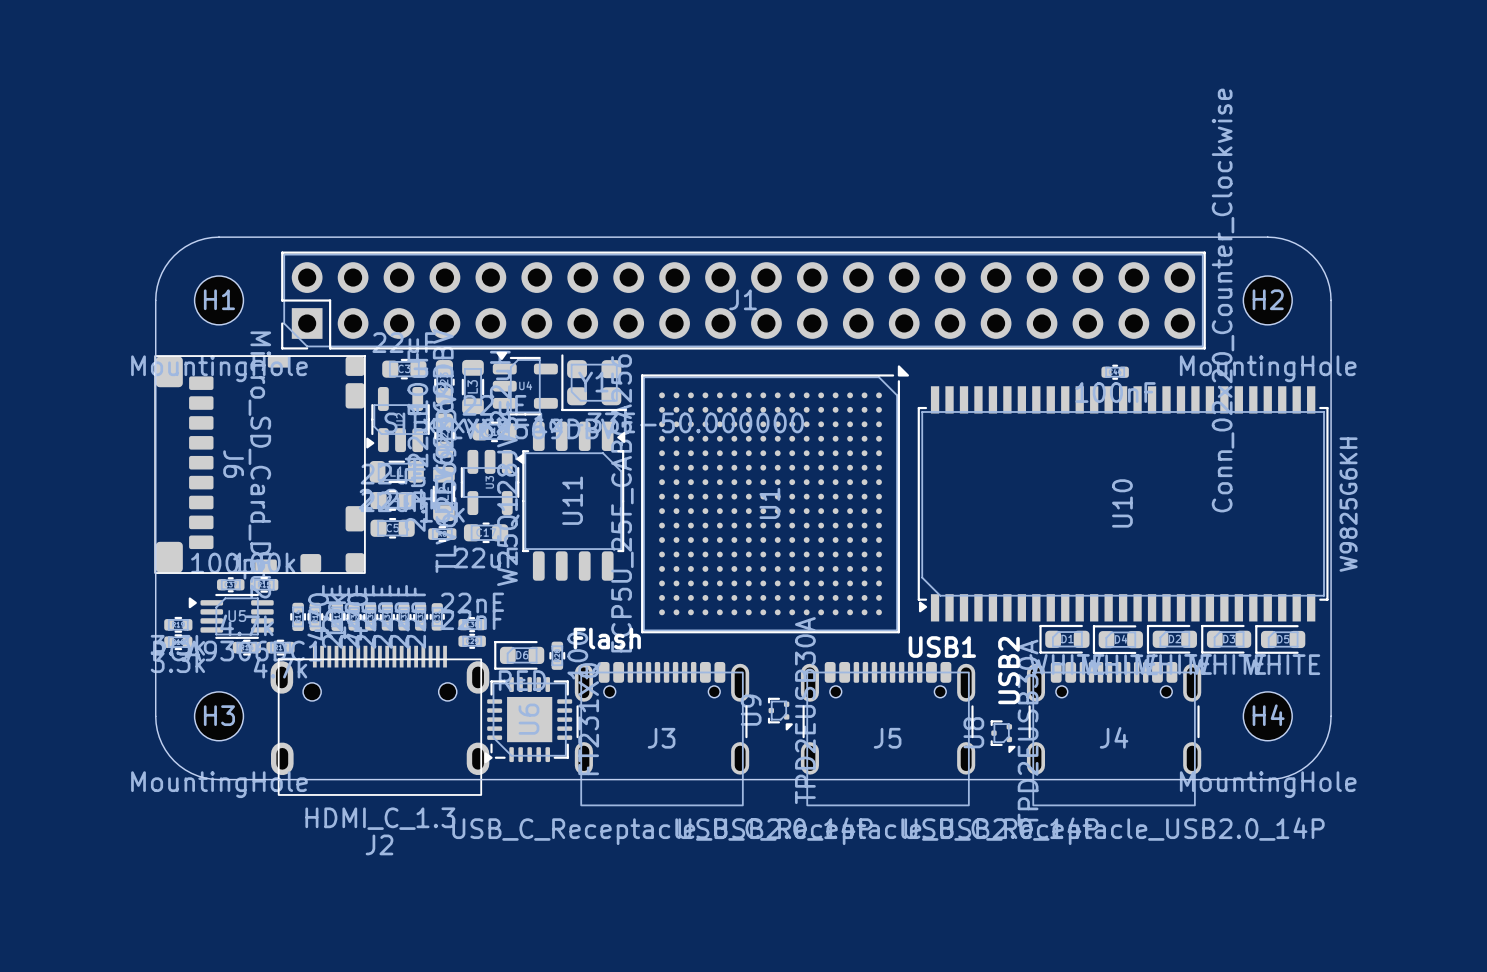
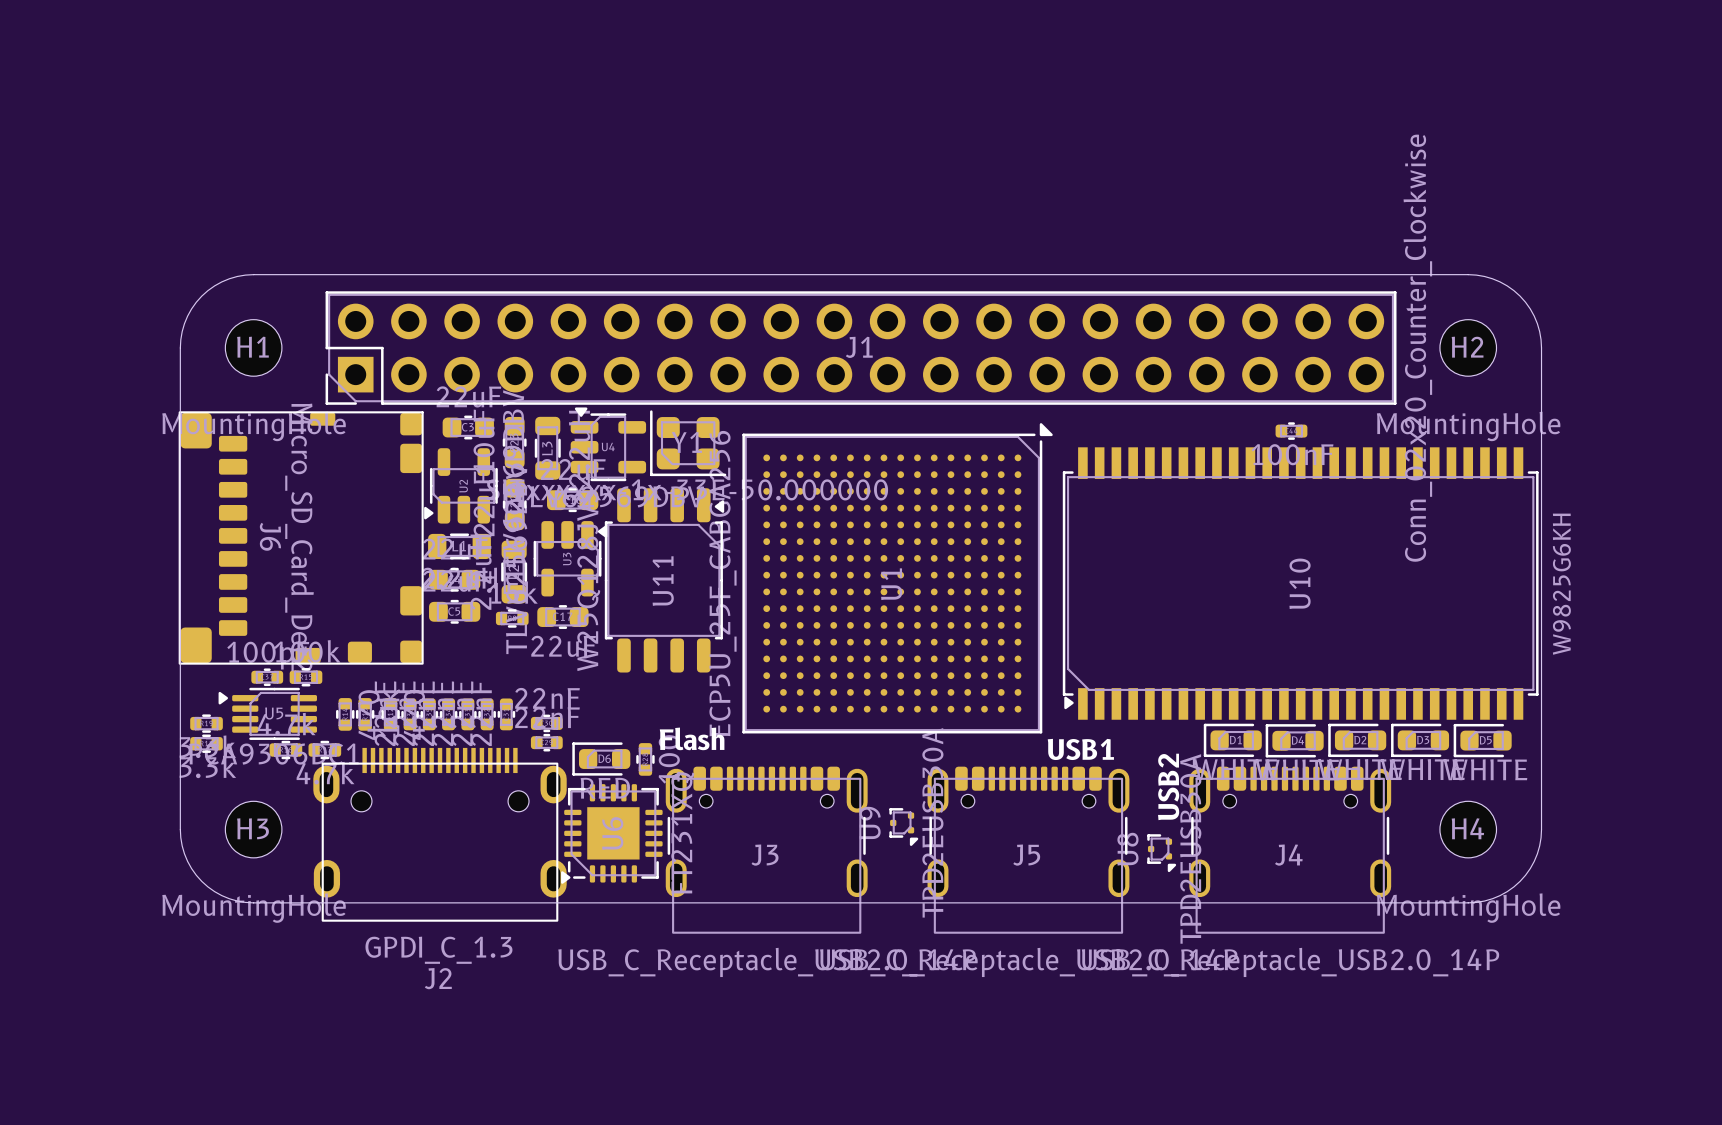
J2 value: HDMI_C_1.3 (380, 818) -> GPDI_C_1.3 (438, 950)

